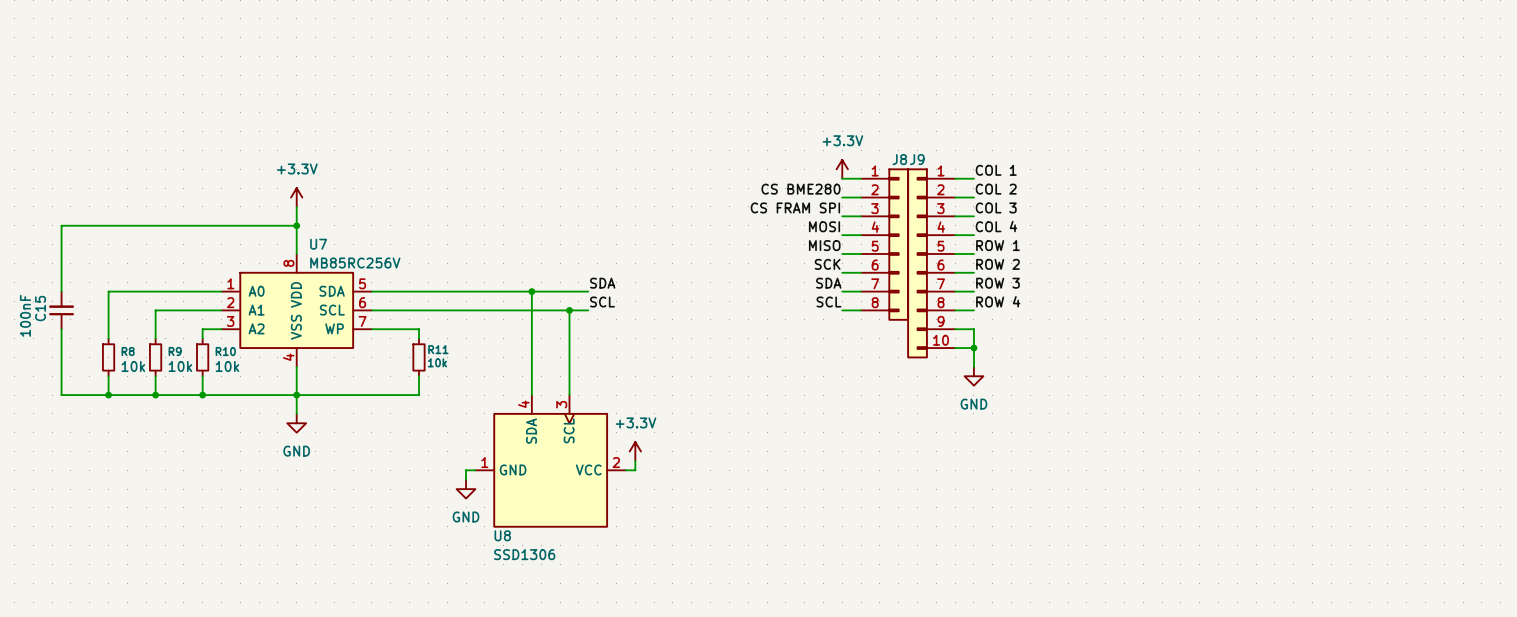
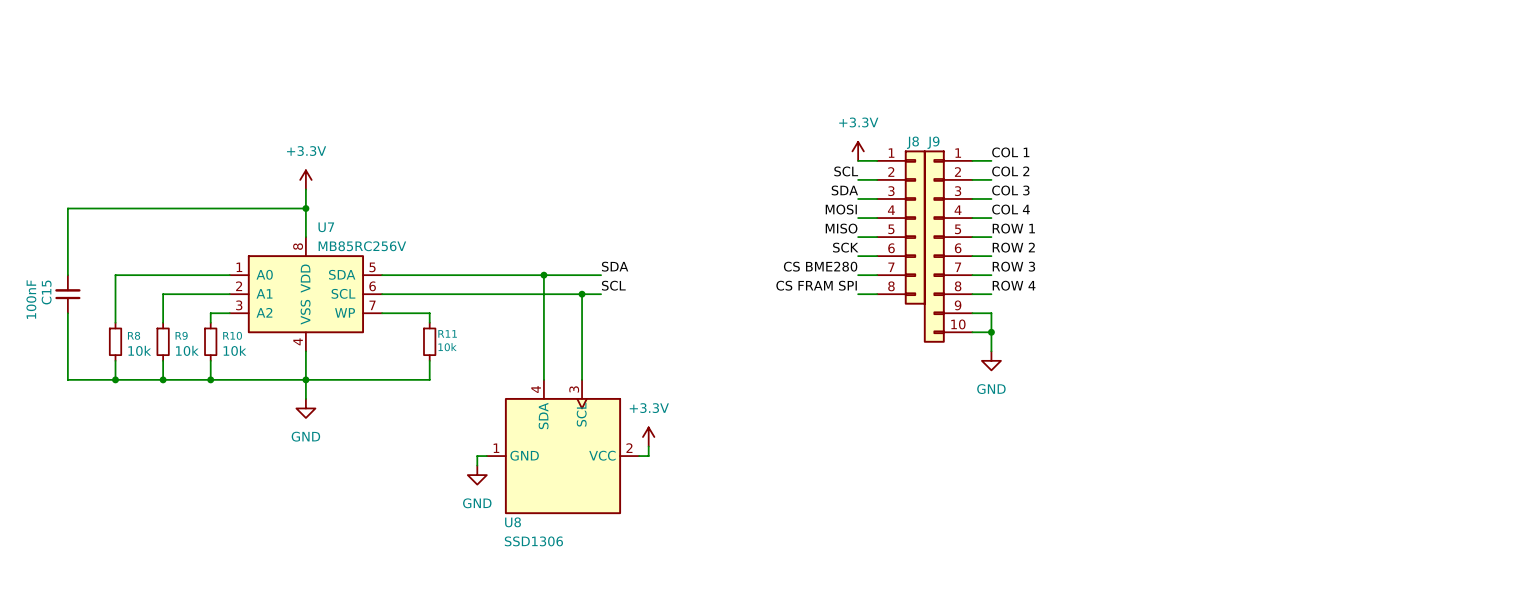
label: CS BME280 (800, 189) -> SCL (846, 171)
label: CS FRAM SPI (795, 207) -> SDA (844, 190)
label: SDA (828, 283) -> CS BME280 (820, 266)
label: SCL (828, 302) -> CS FRAM SPI (816, 285)

